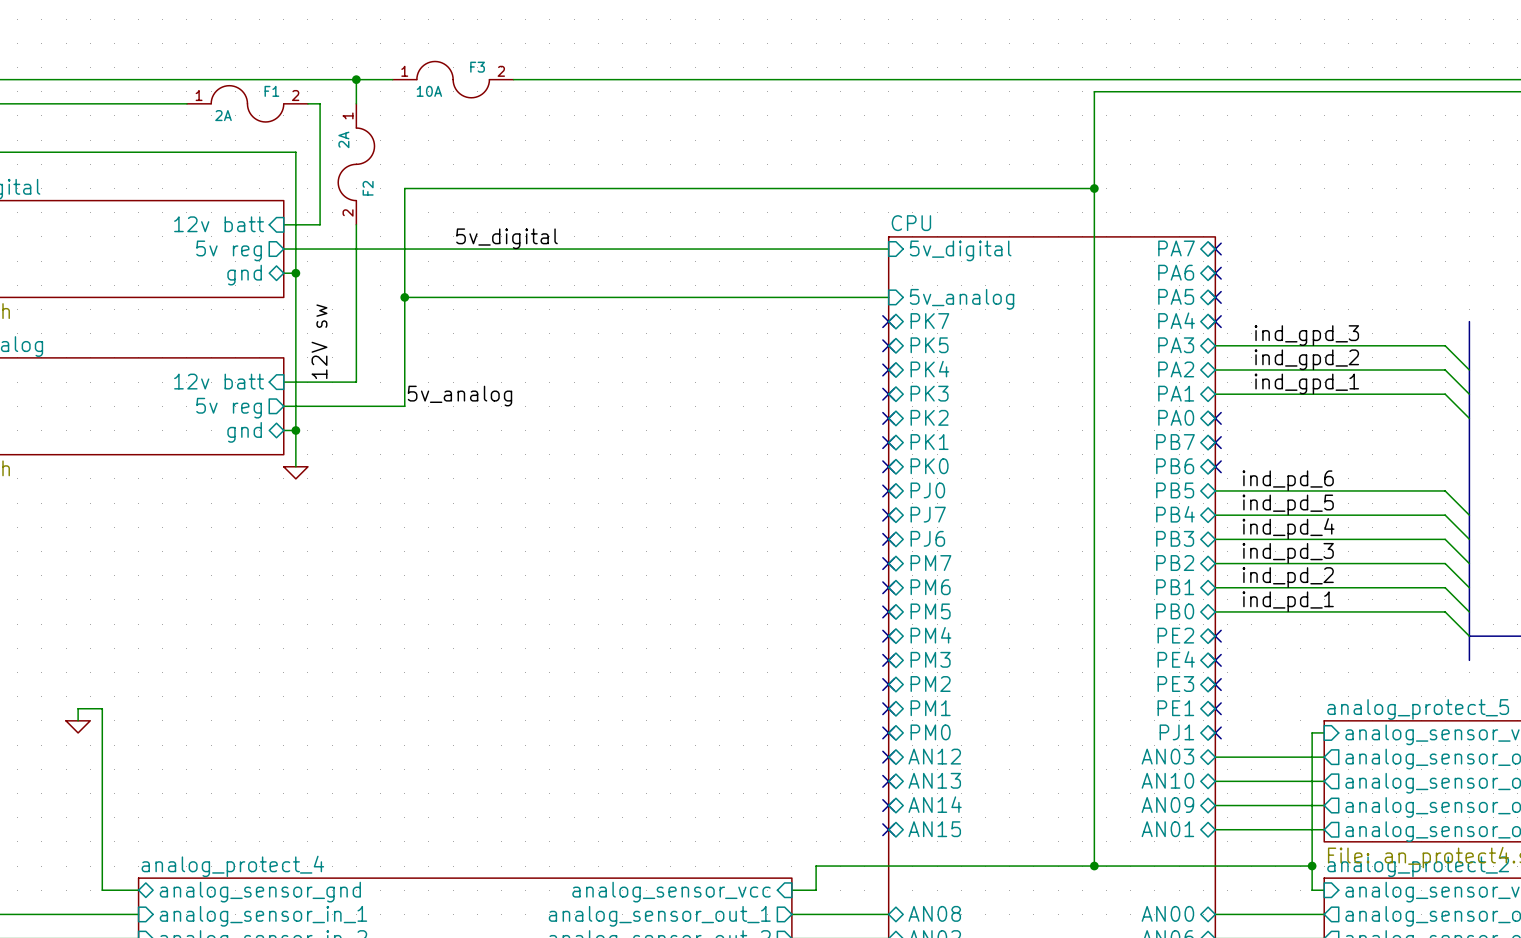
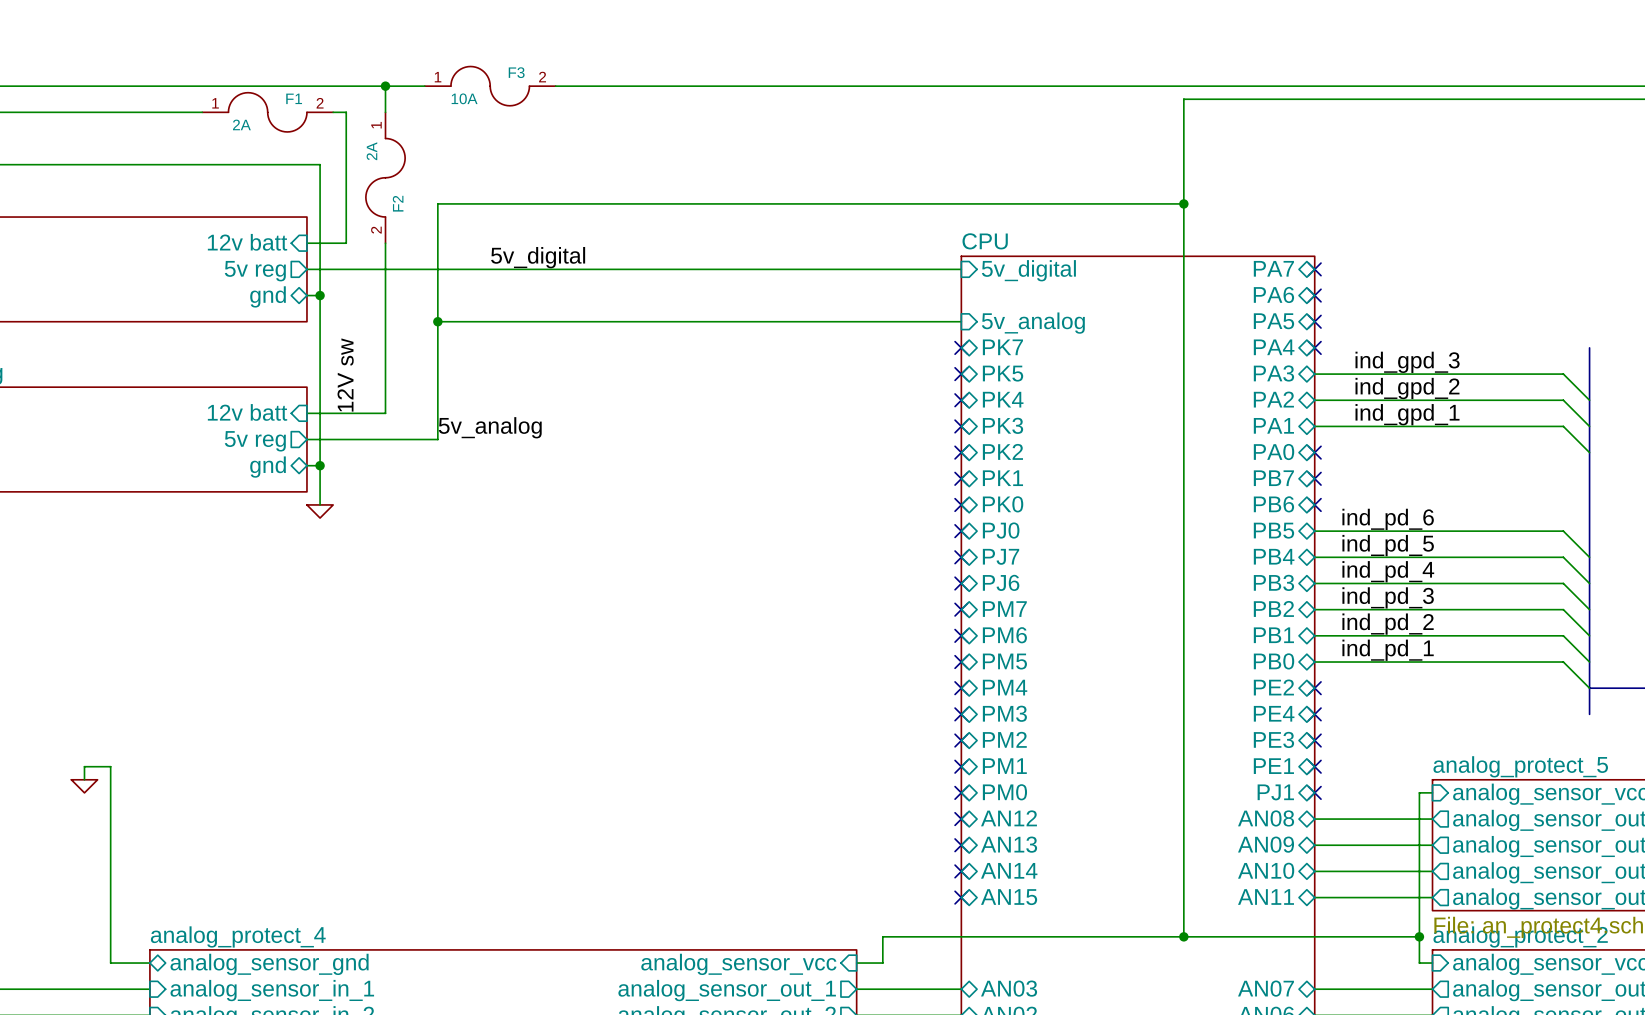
sheet pin: AN03 (1167, 756) -> AN08 (1266, 818)
sheet pin: AN10 (1167, 780) -> AN09 (1266, 844)
sheet pin: AN09 (1167, 804) -> AN10 (1266, 870)
sheet pin: AN01 (1167, 829) -> AN11 (1266, 897)
sheet pin: AN08 (934, 913) -> AN03 (1009, 988)
sheet pin: AN00 (1167, 913) -> AN07 (1265, 988)

